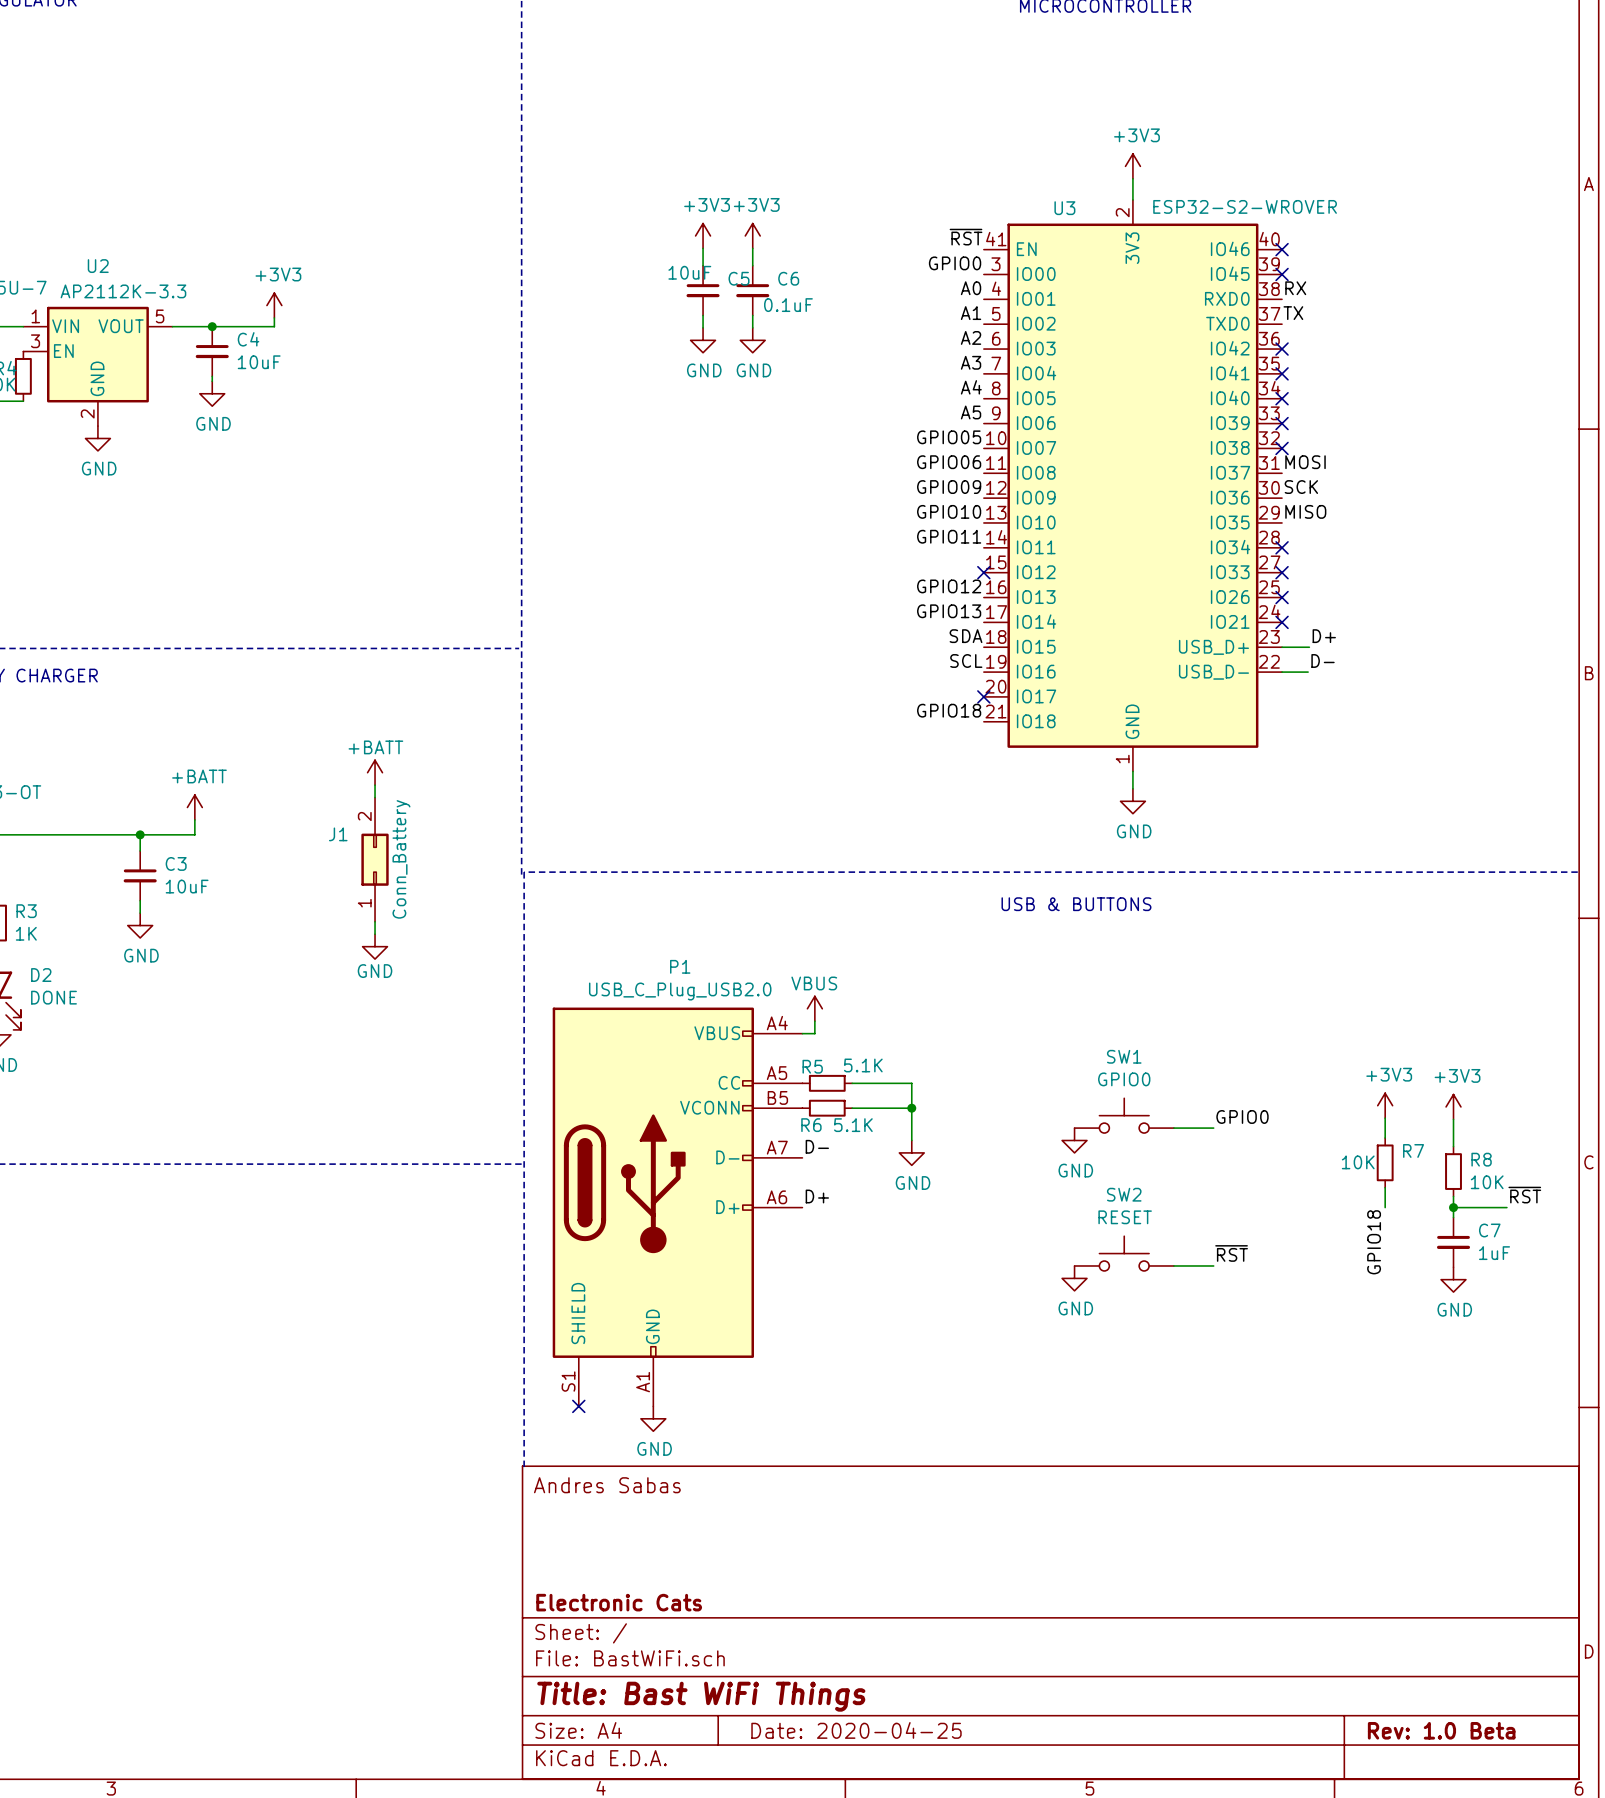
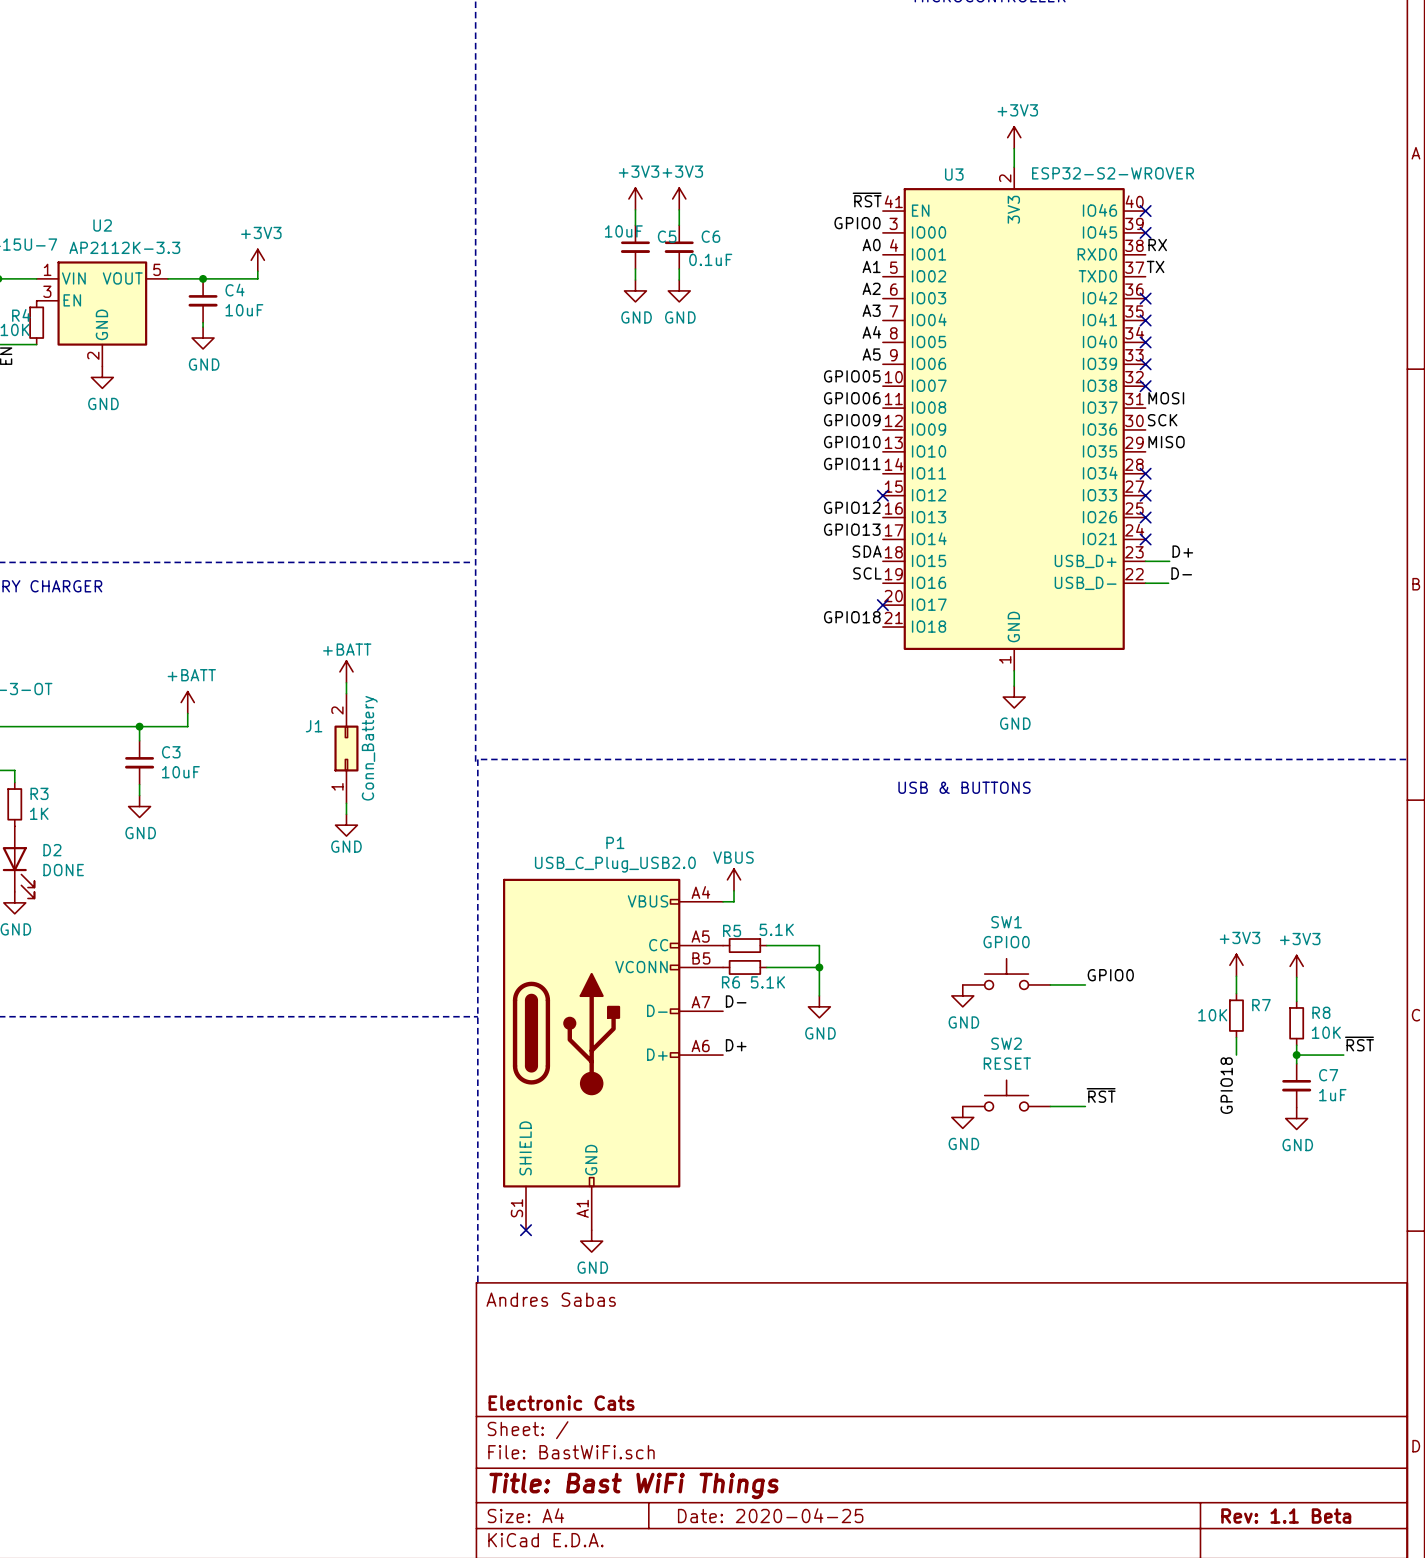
title block: Rev: 1.0 Beta (1441, 1730) -> Rev: 1.1 Beta (1286, 1516)

